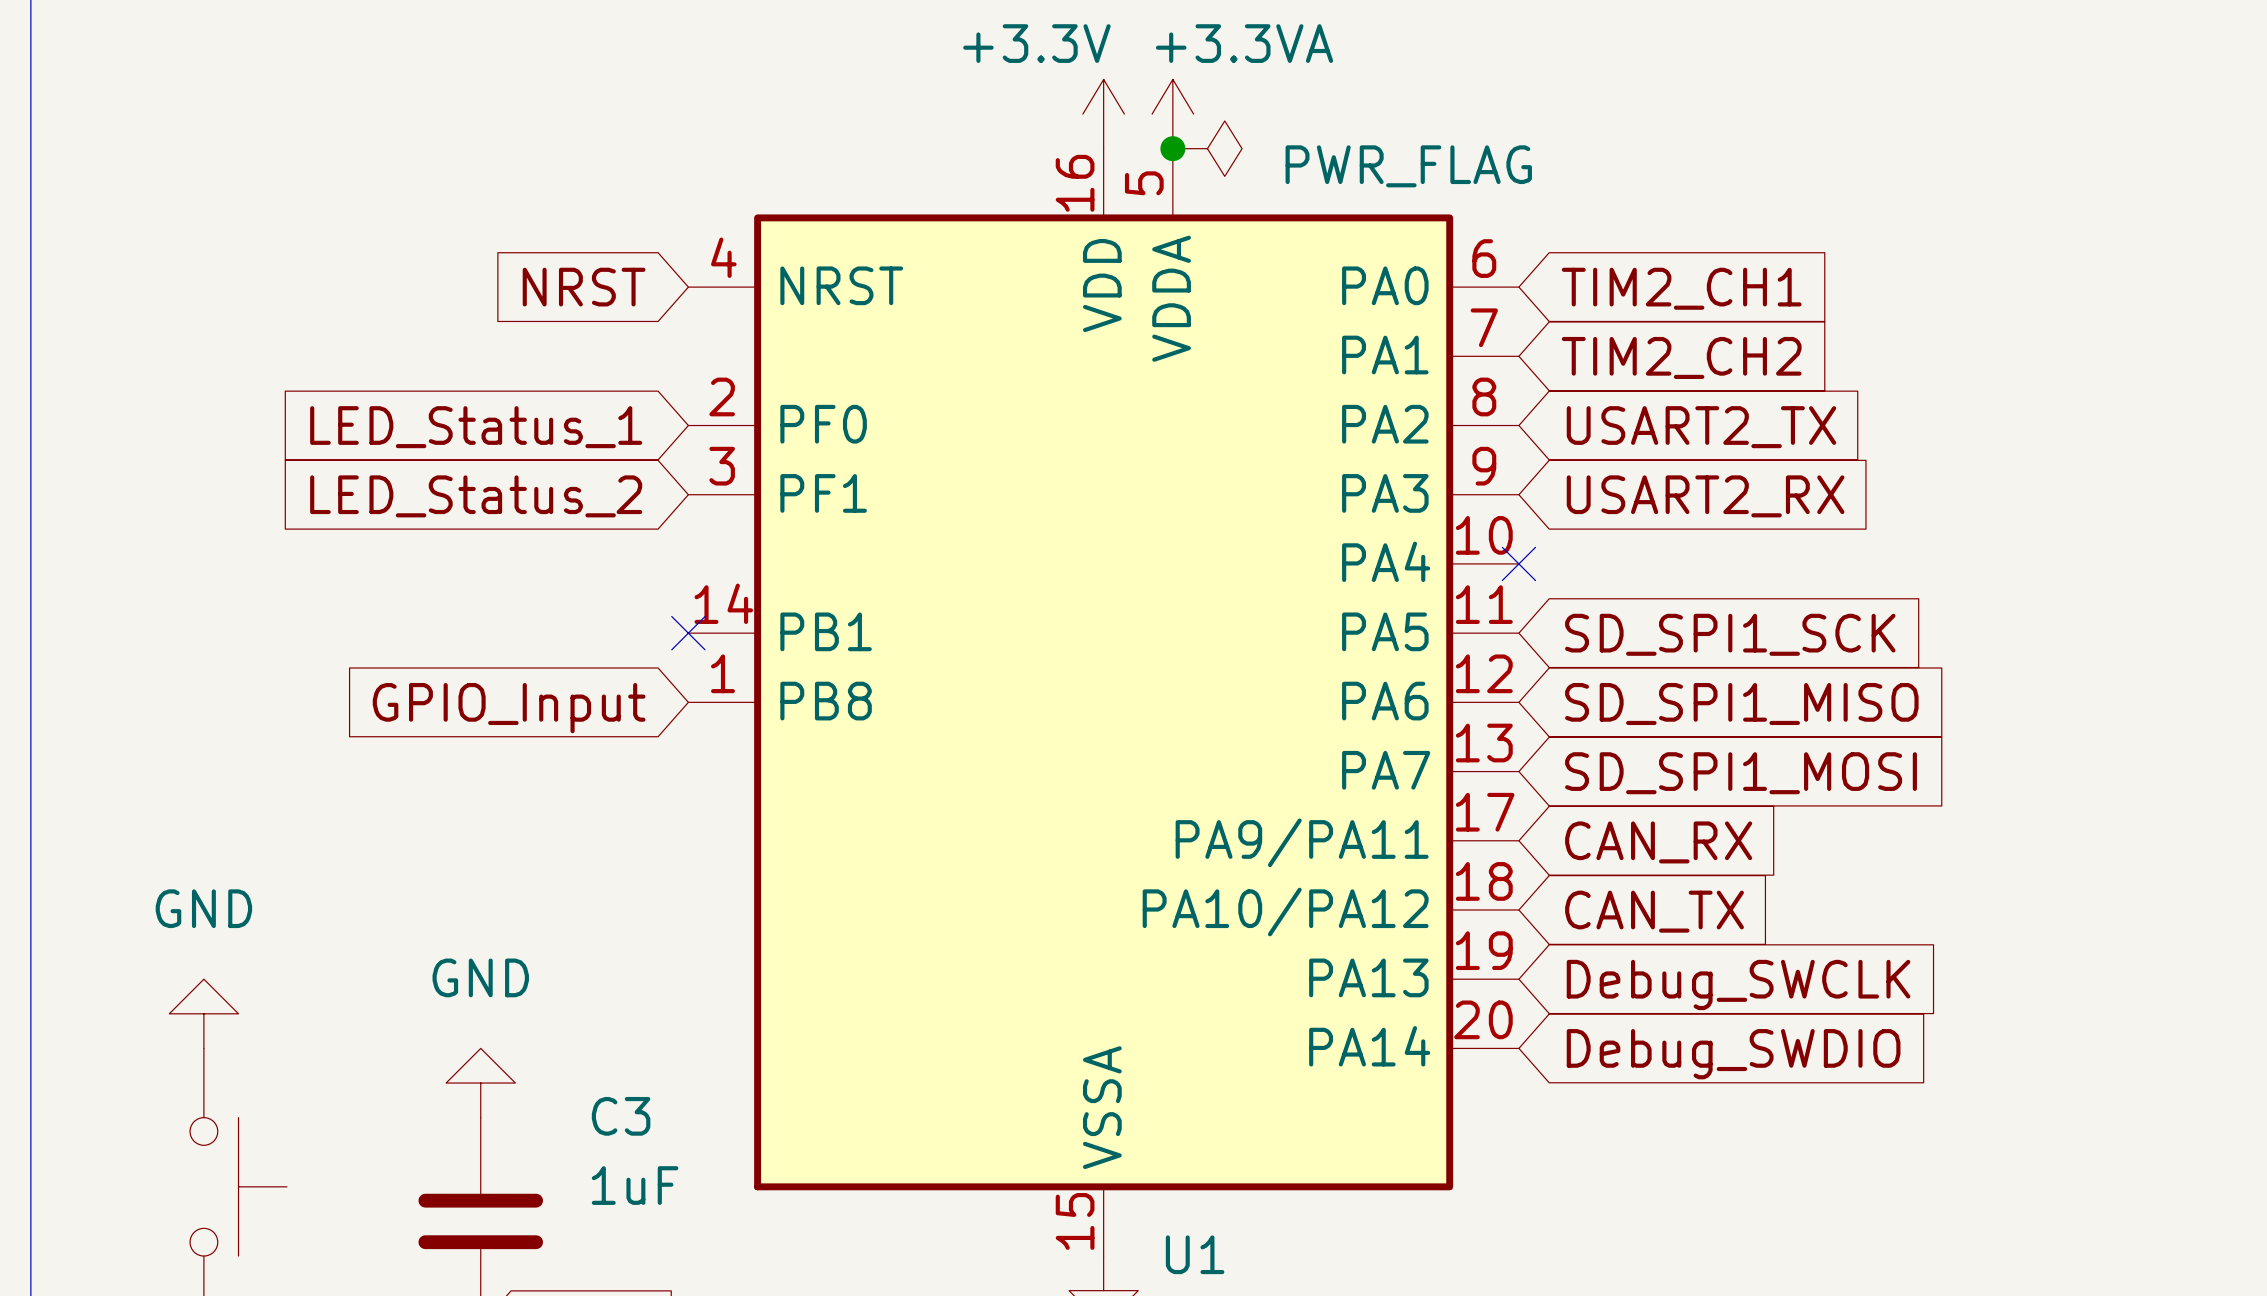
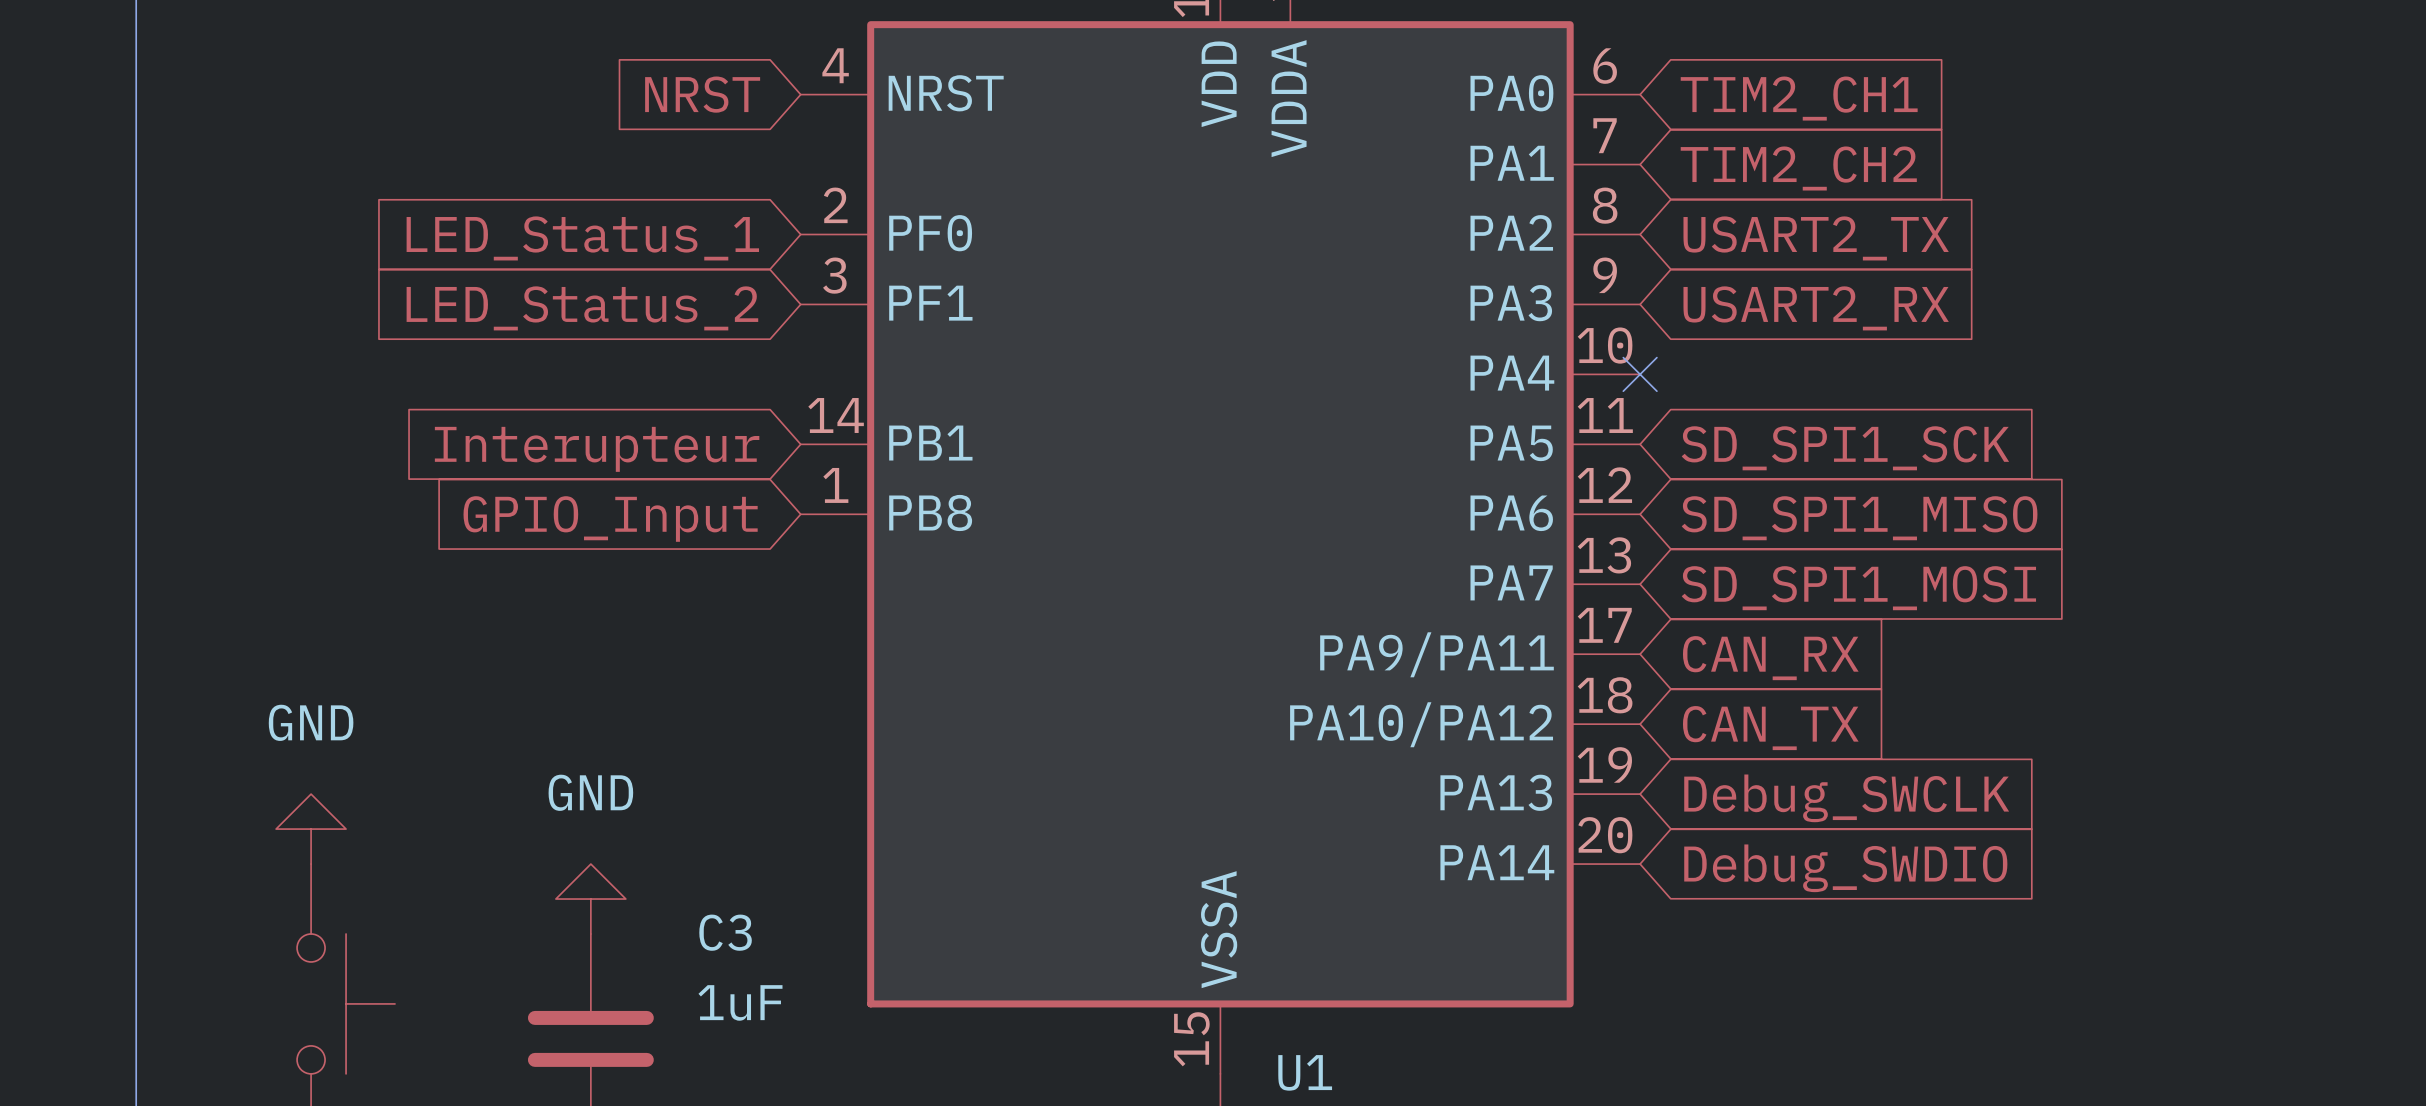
no-connect mark: (688, 633) -> none
global label: none -> Interupteur (597, 449)

